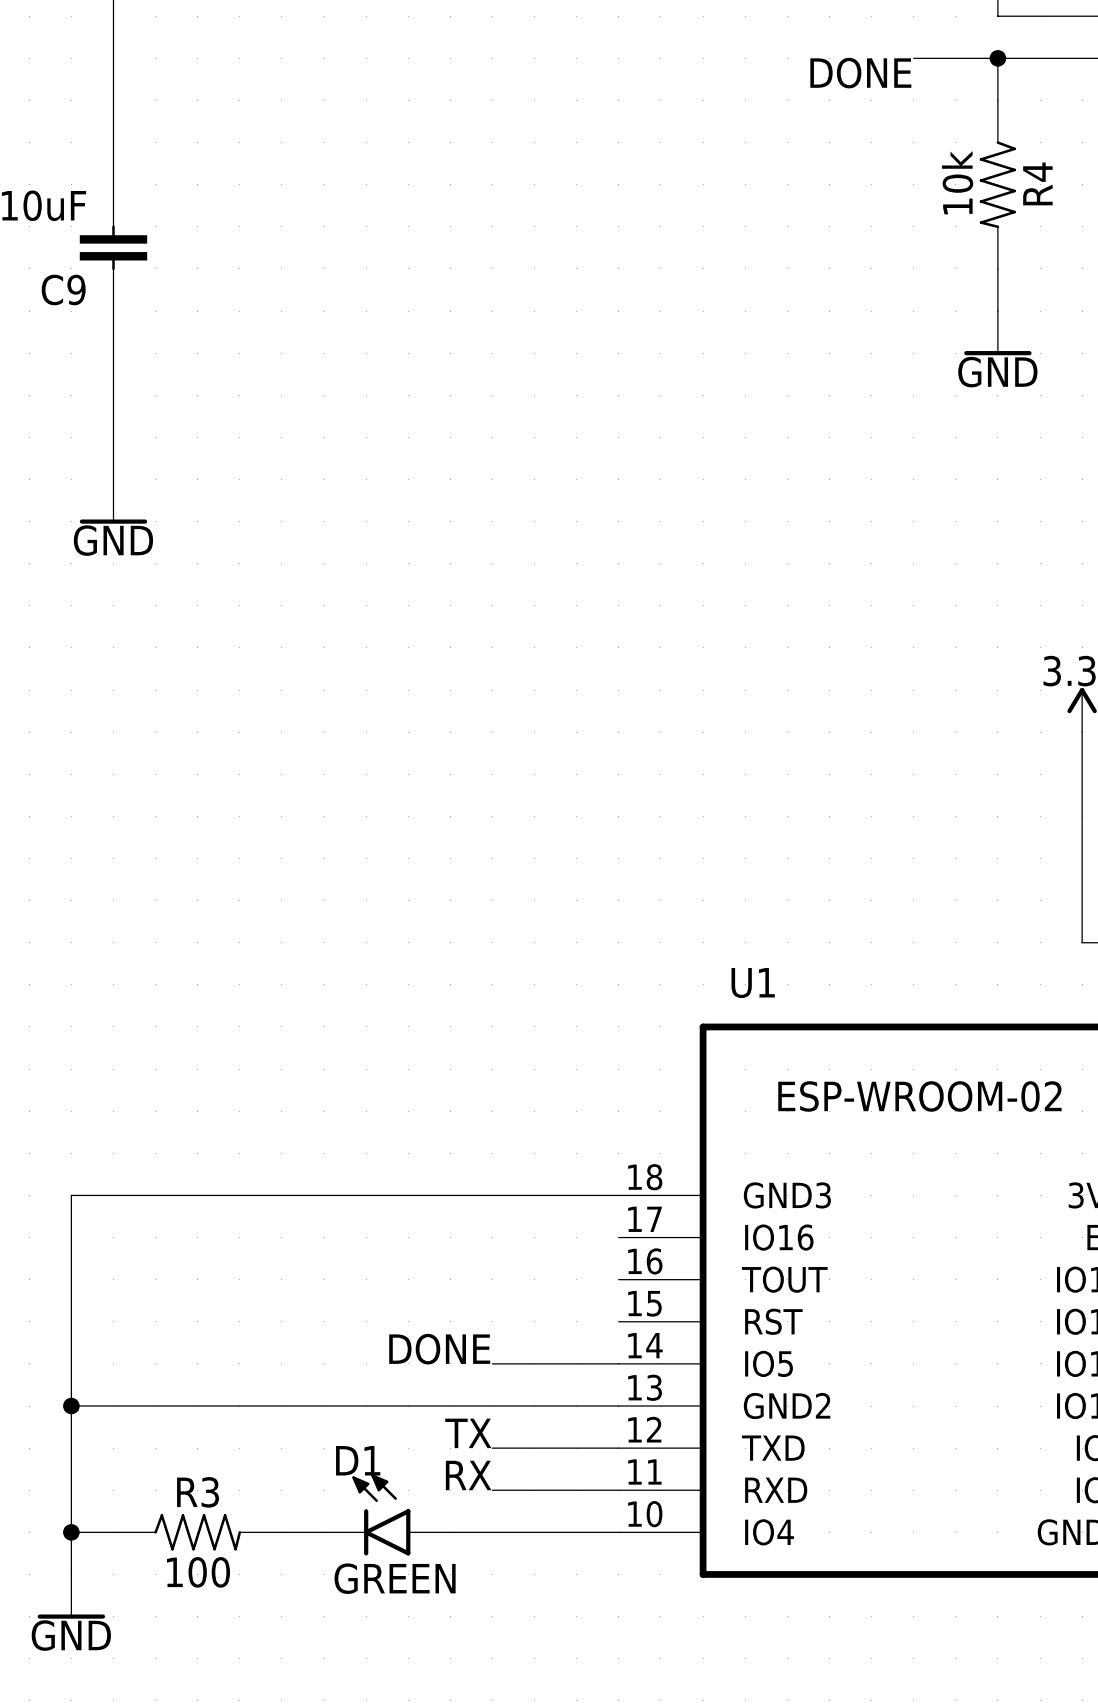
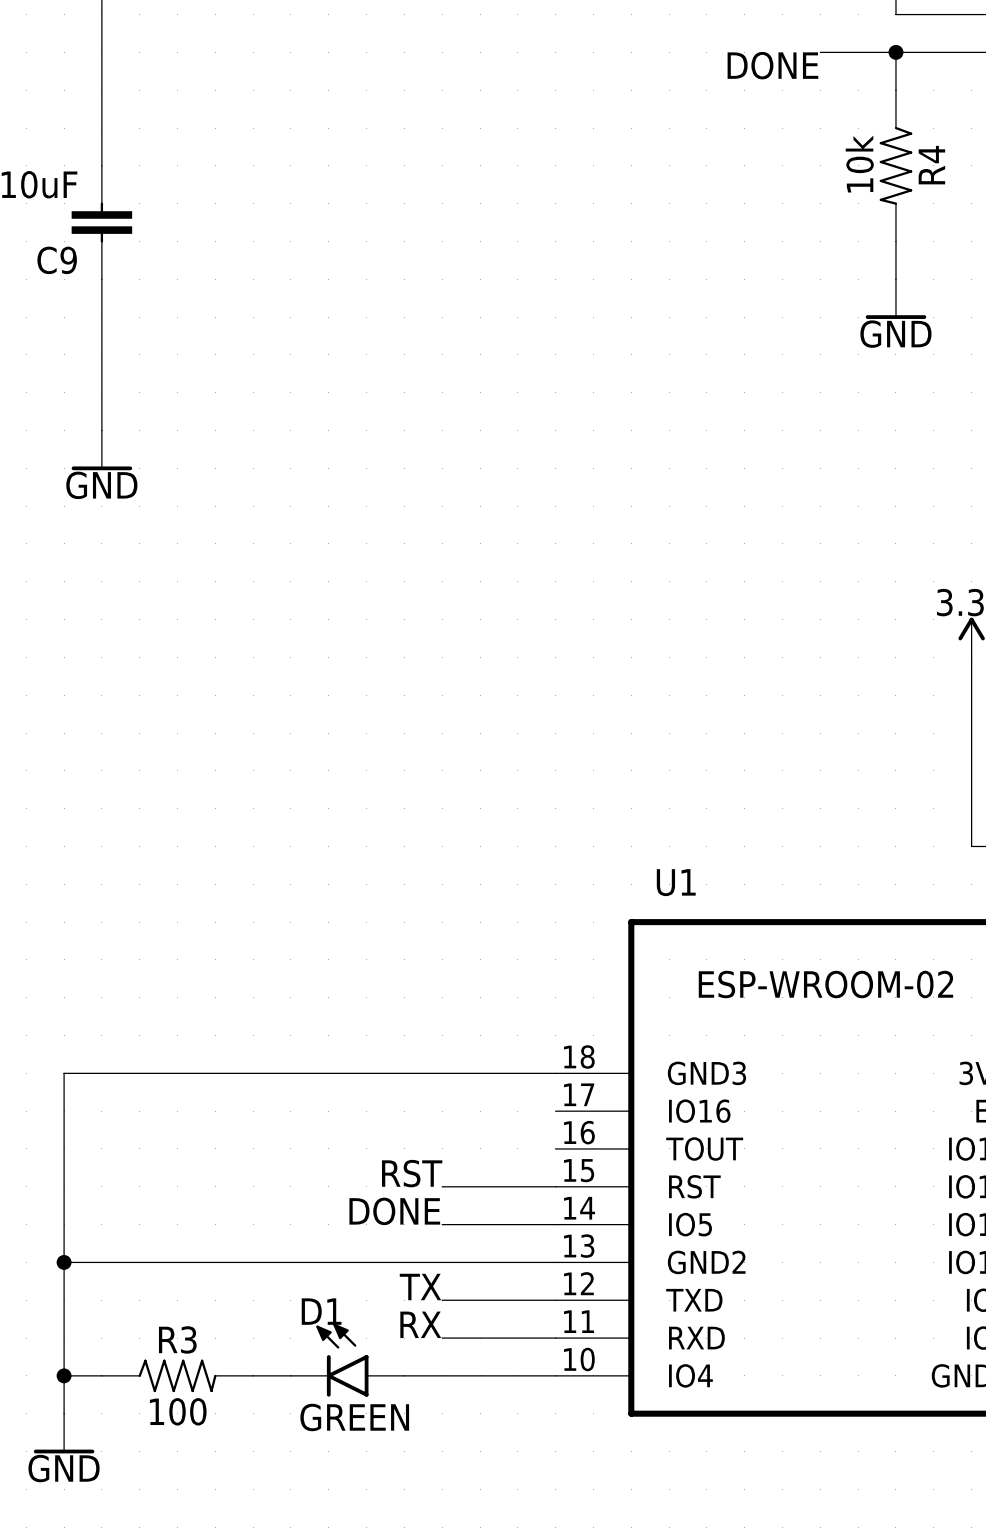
label: none -> RST (412, 1173)
wire: none -> (442, 1186) (555, 1186)

